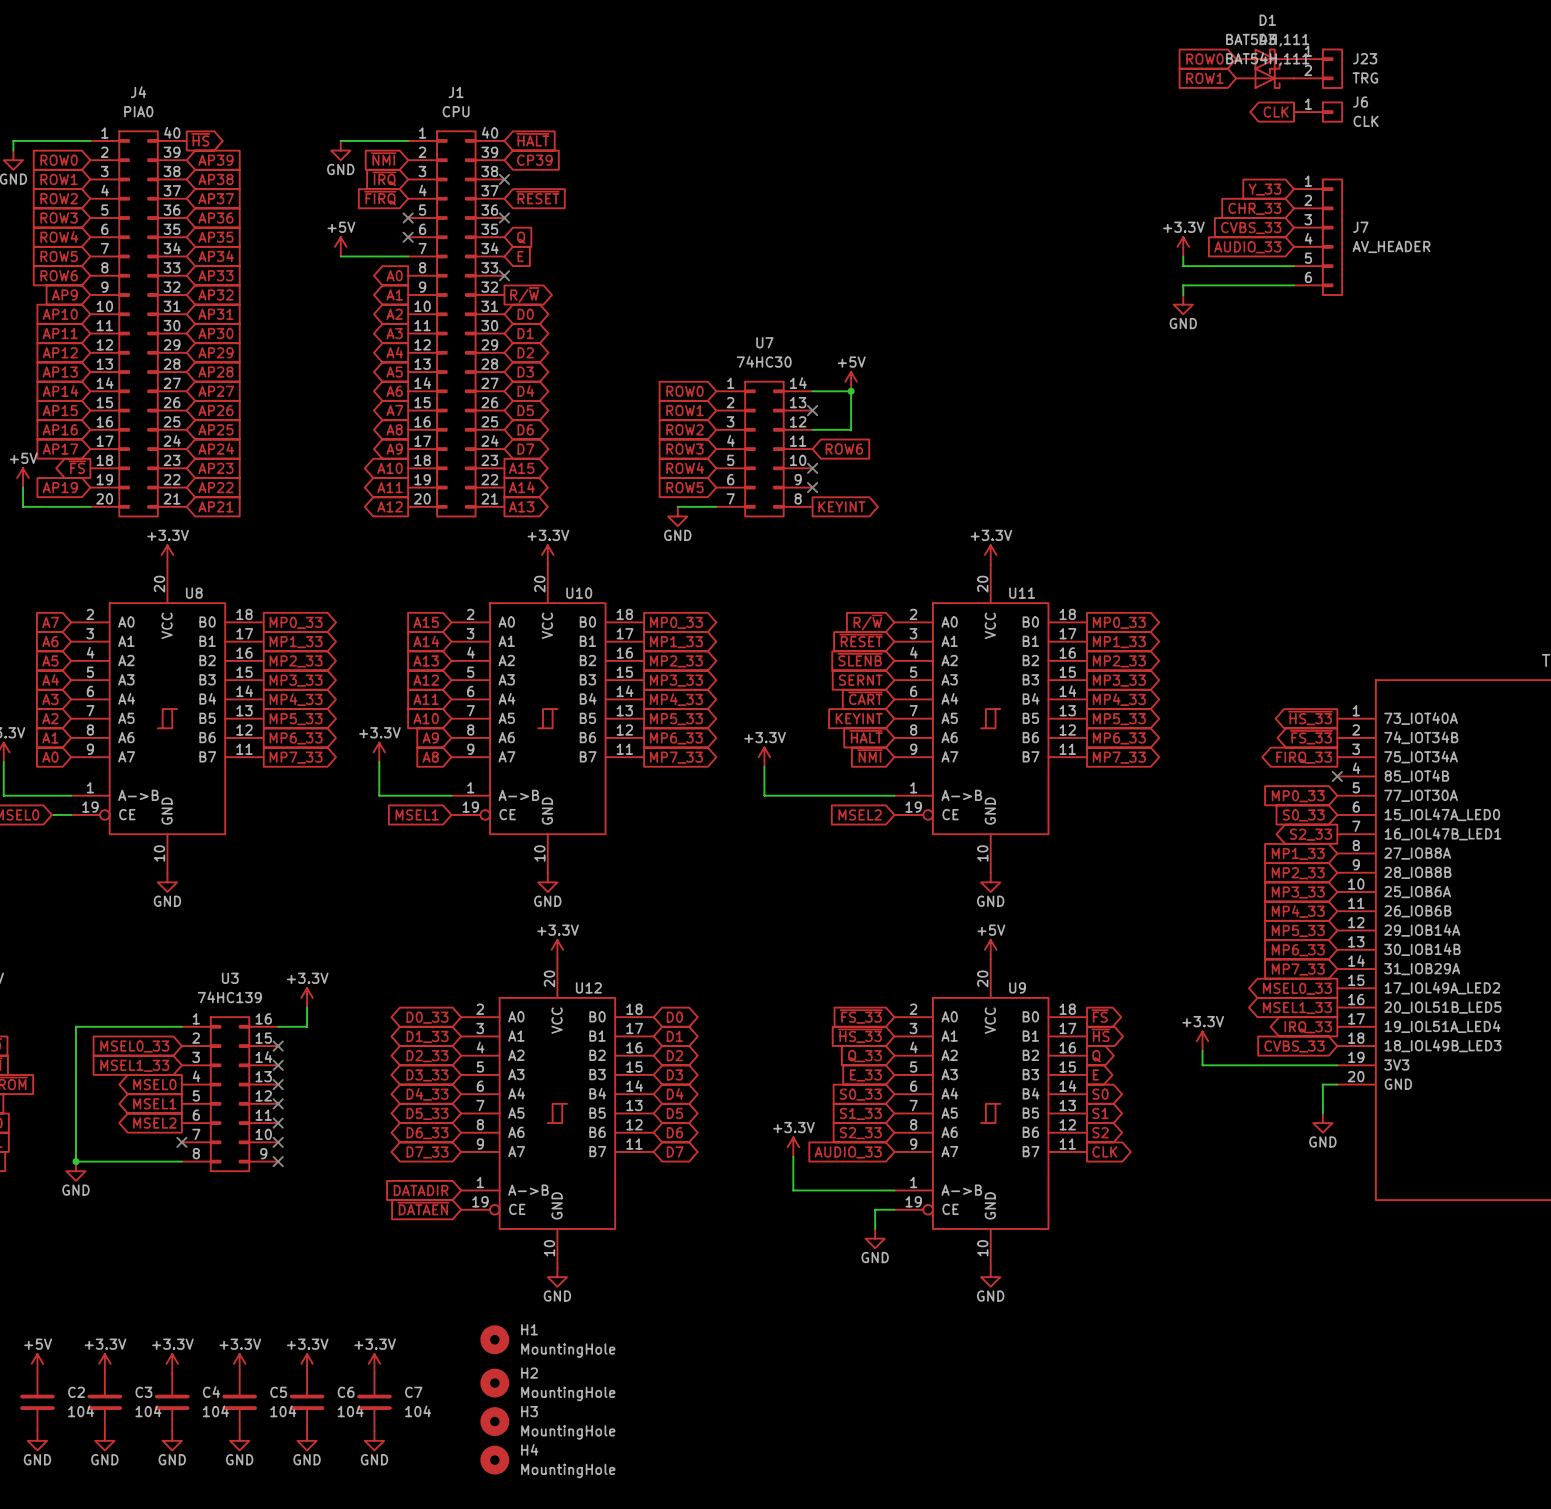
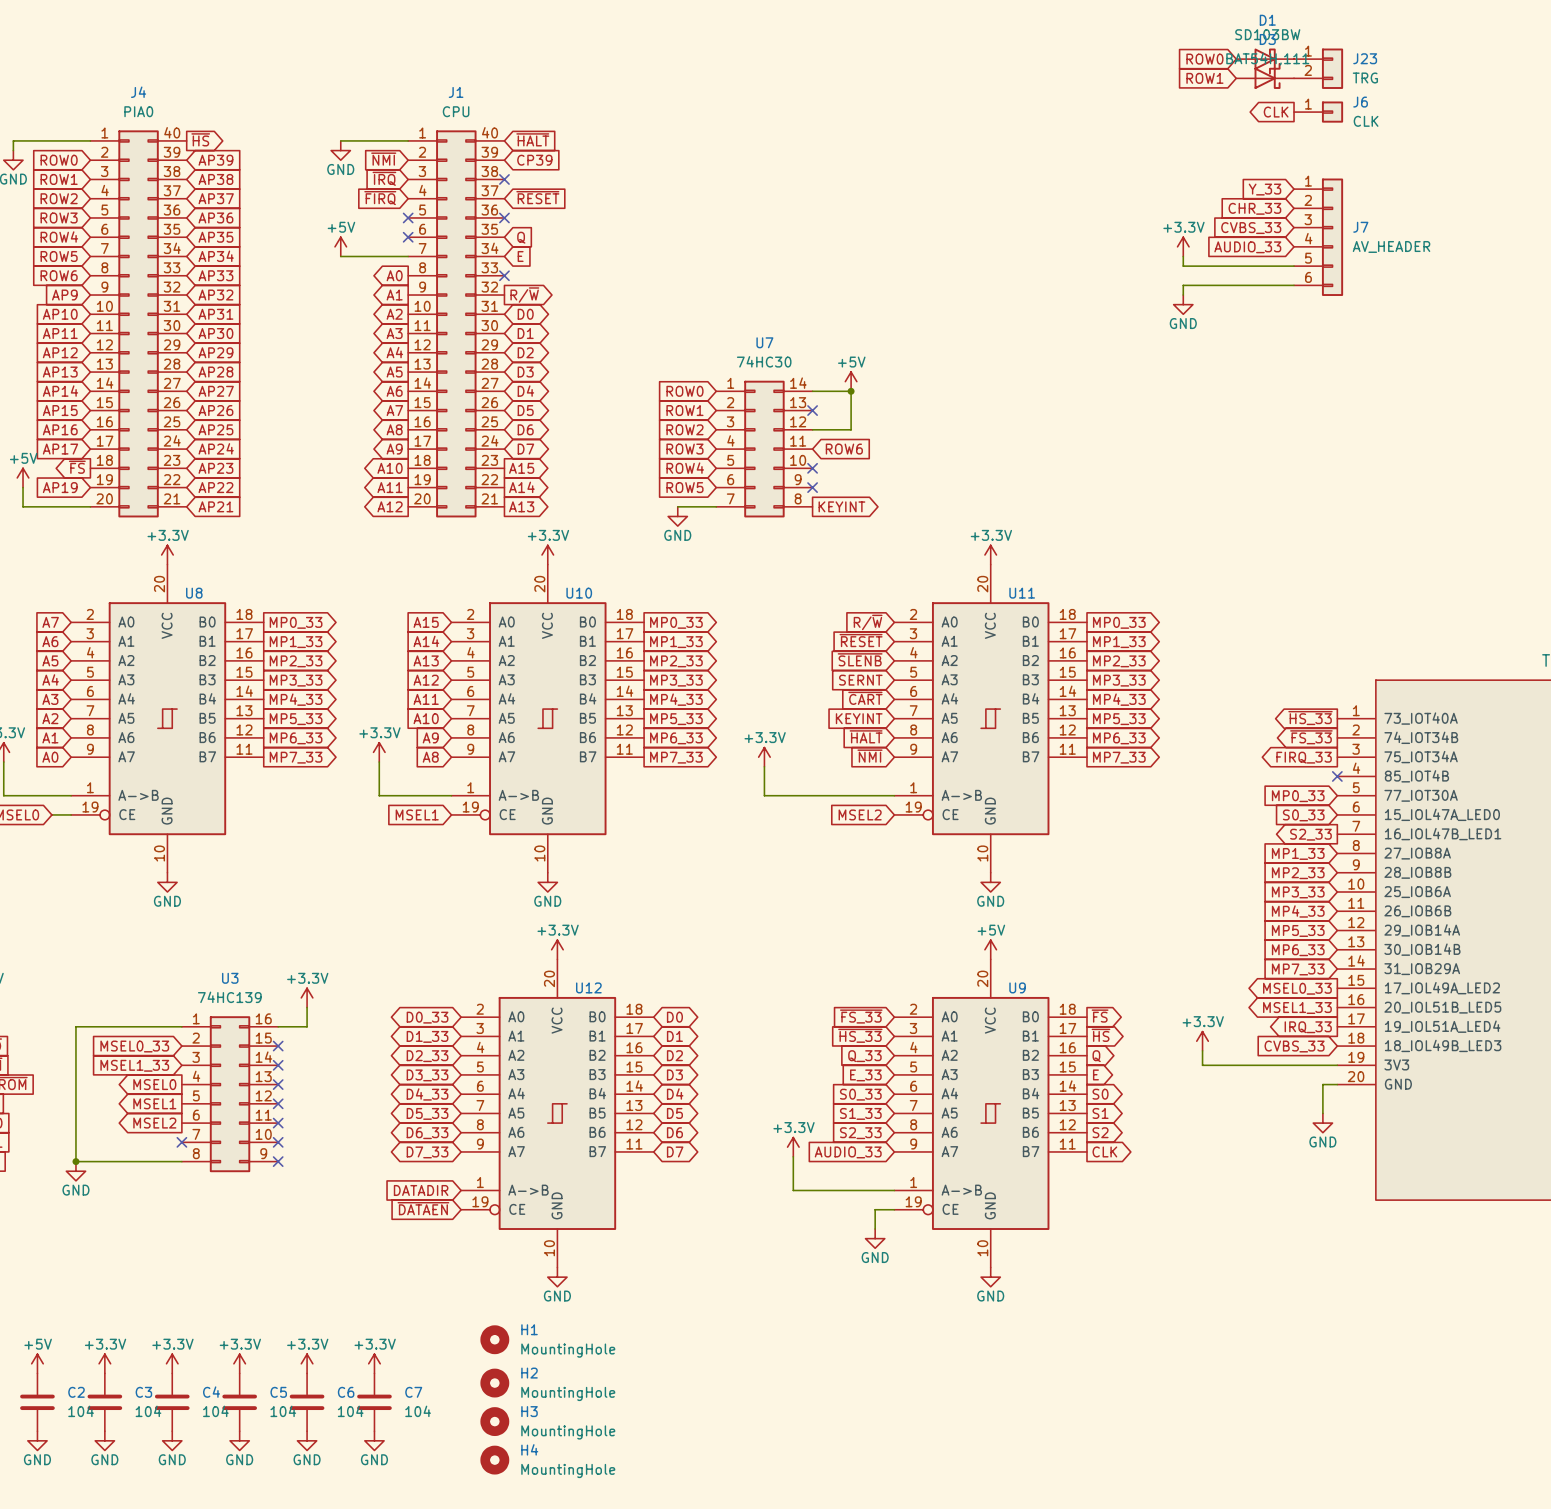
D1 value: BAT54H,111 (1267, 39) -> SD103BW (1267, 34)

